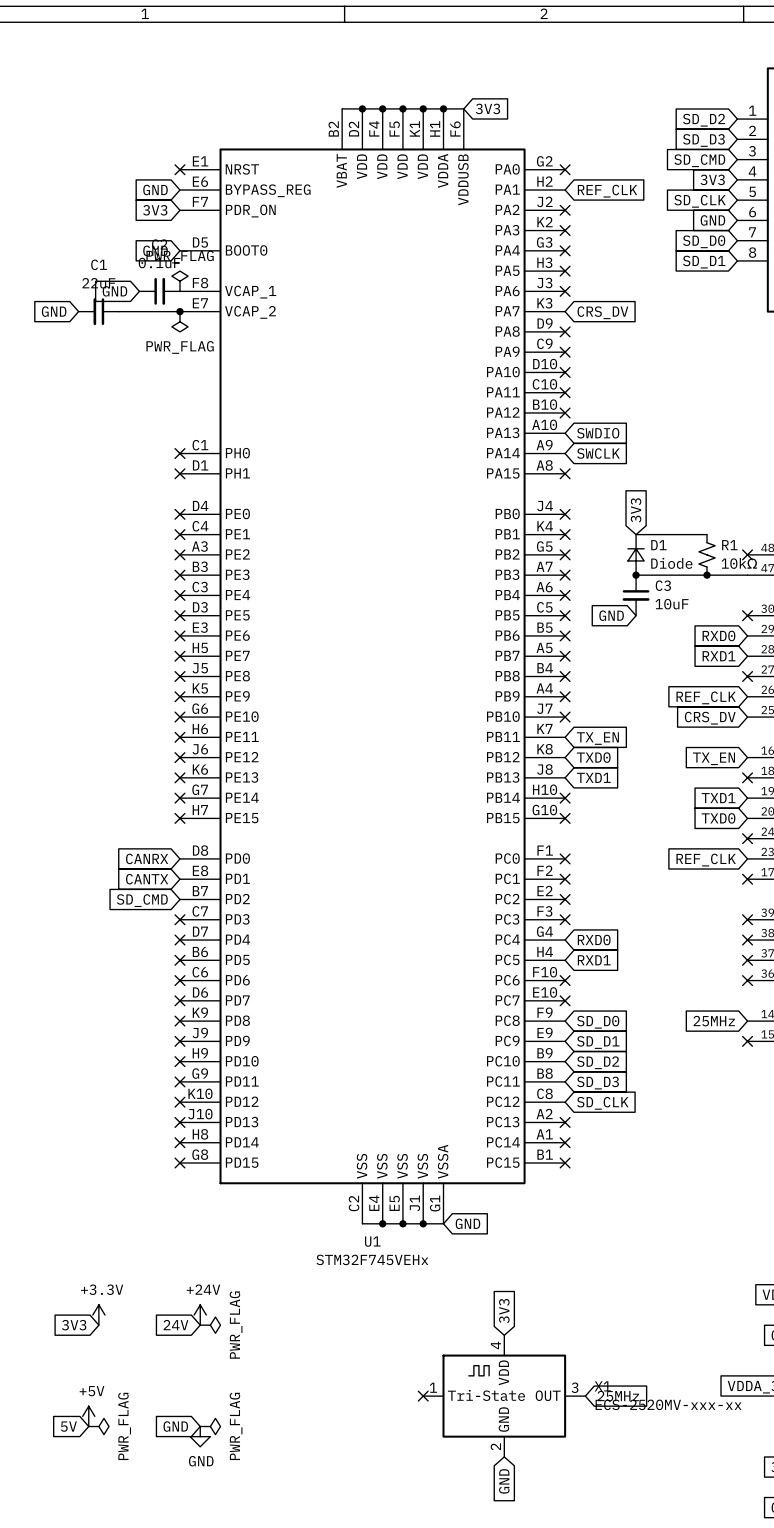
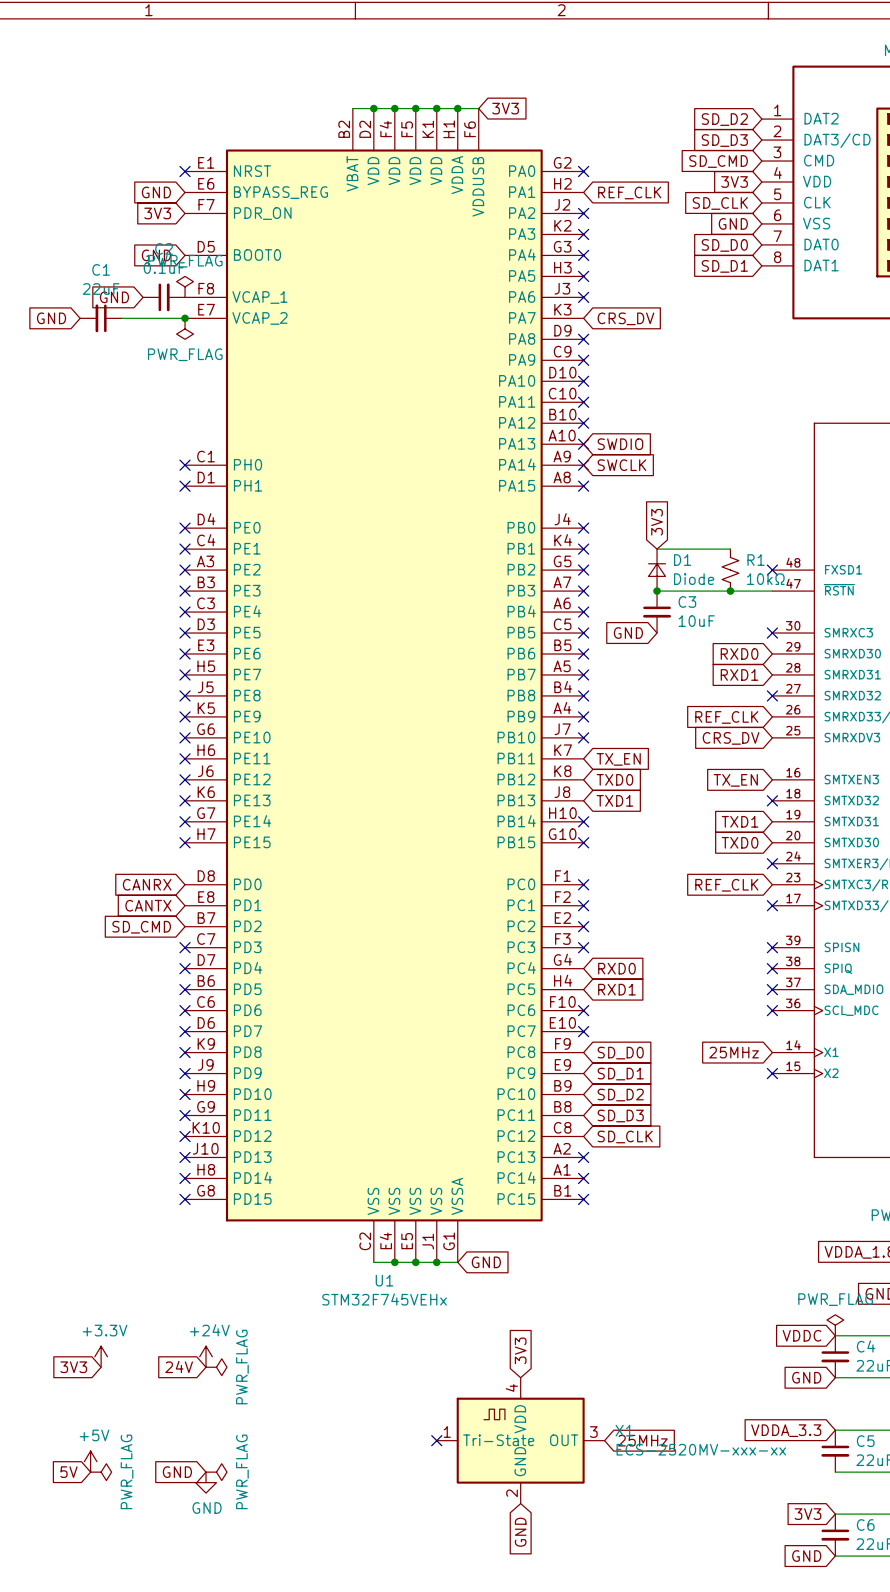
no-connect mark: none -> (583, 444)
no-connect mark: none -> (583, 465)

